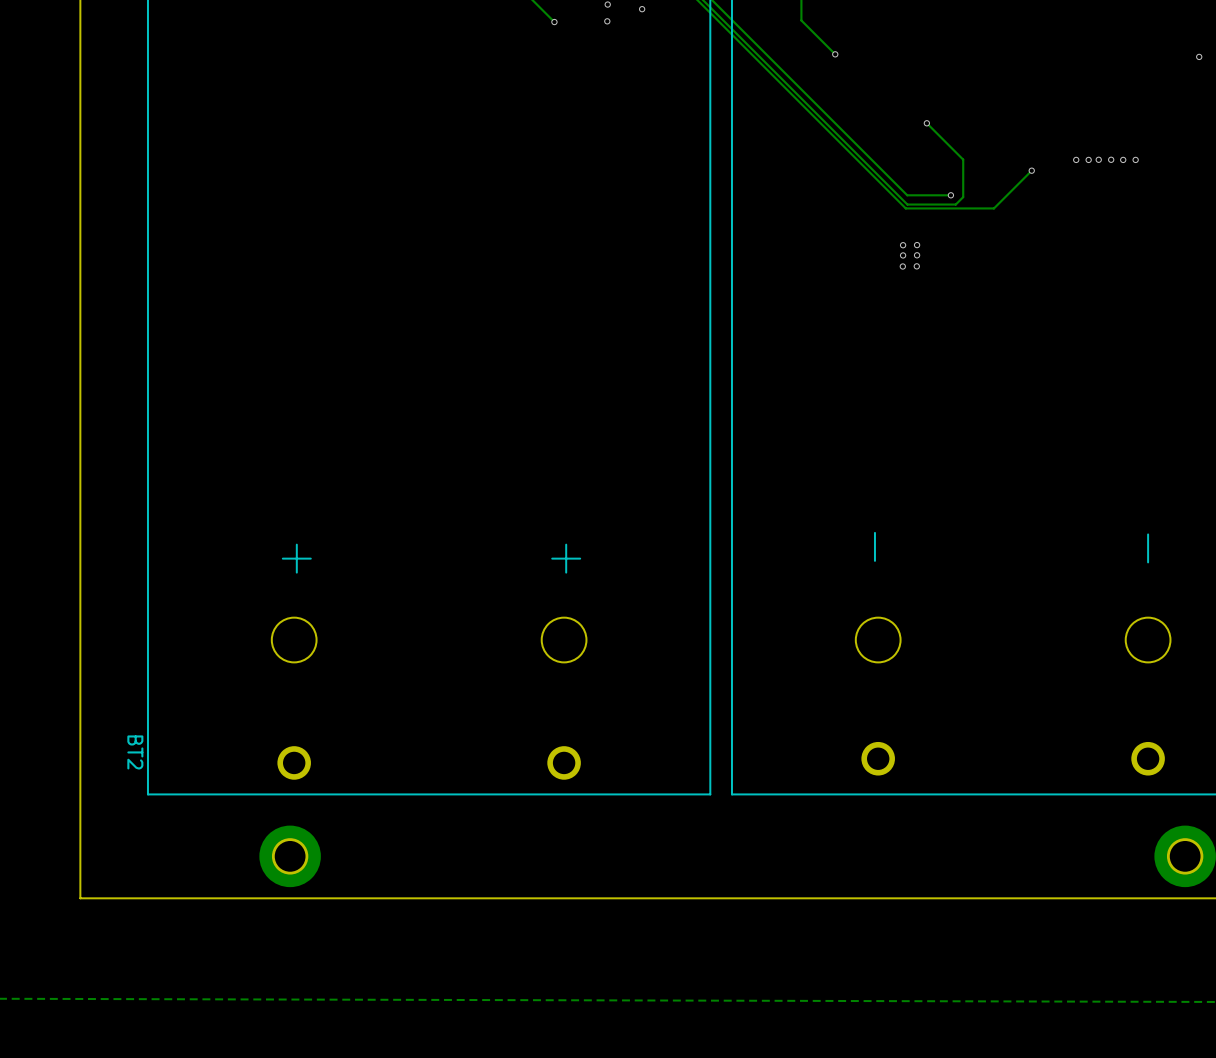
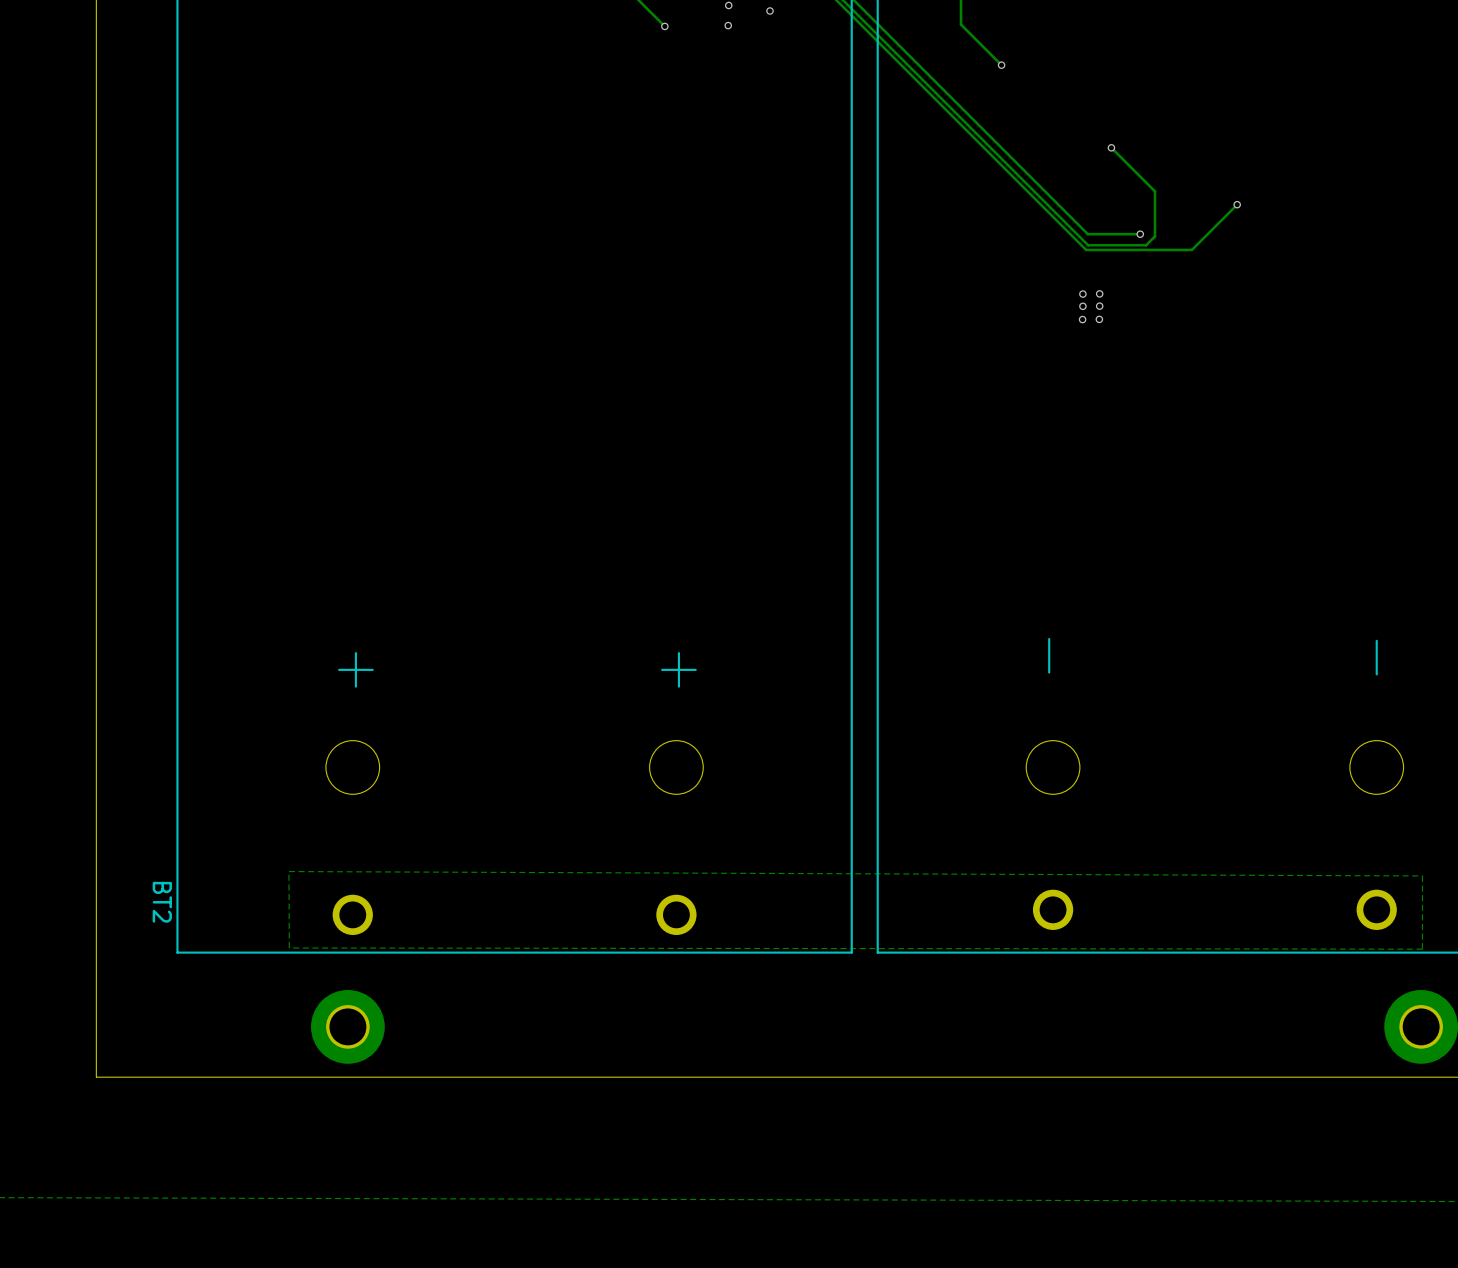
via: (1199, 56) -> none
via: (1076, 159) -> none
via: (1088, 159) -> none
via: (1098, 159) -> none
via: (1111, 159) -> none
via: (1123, 159) -> none
via: (1135, 159) -> none
zone outline: none -> (288, 871) (289, 948) (1422, 949) (1422, 875) (288, 871)

